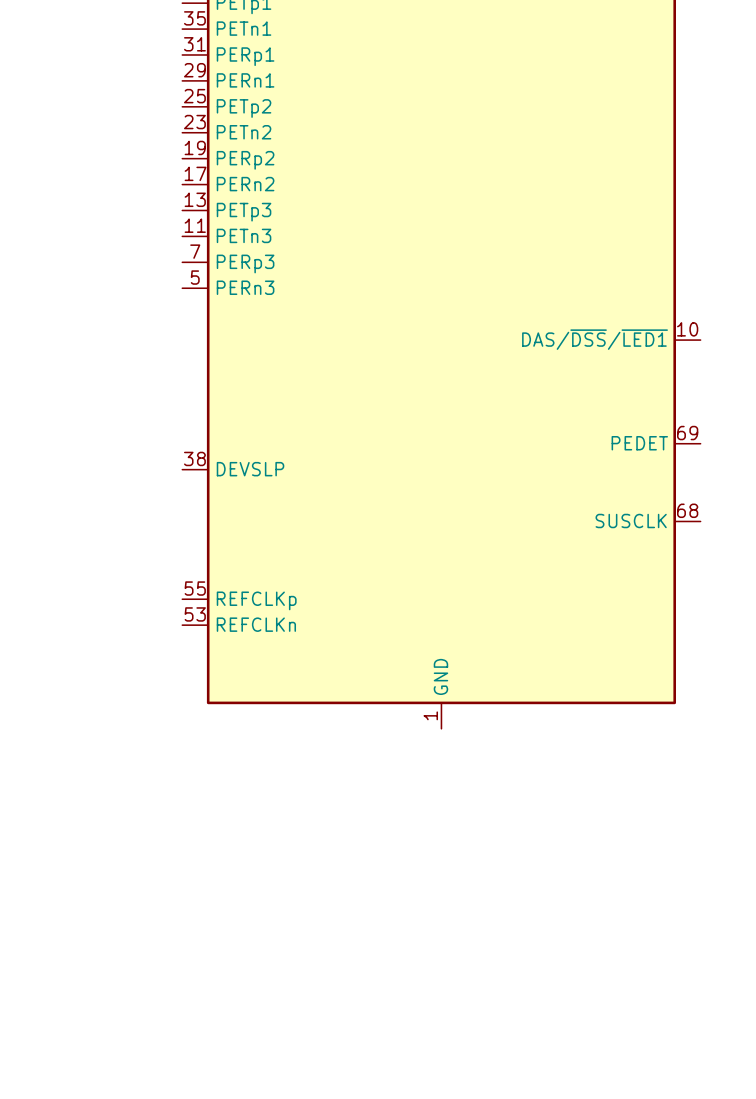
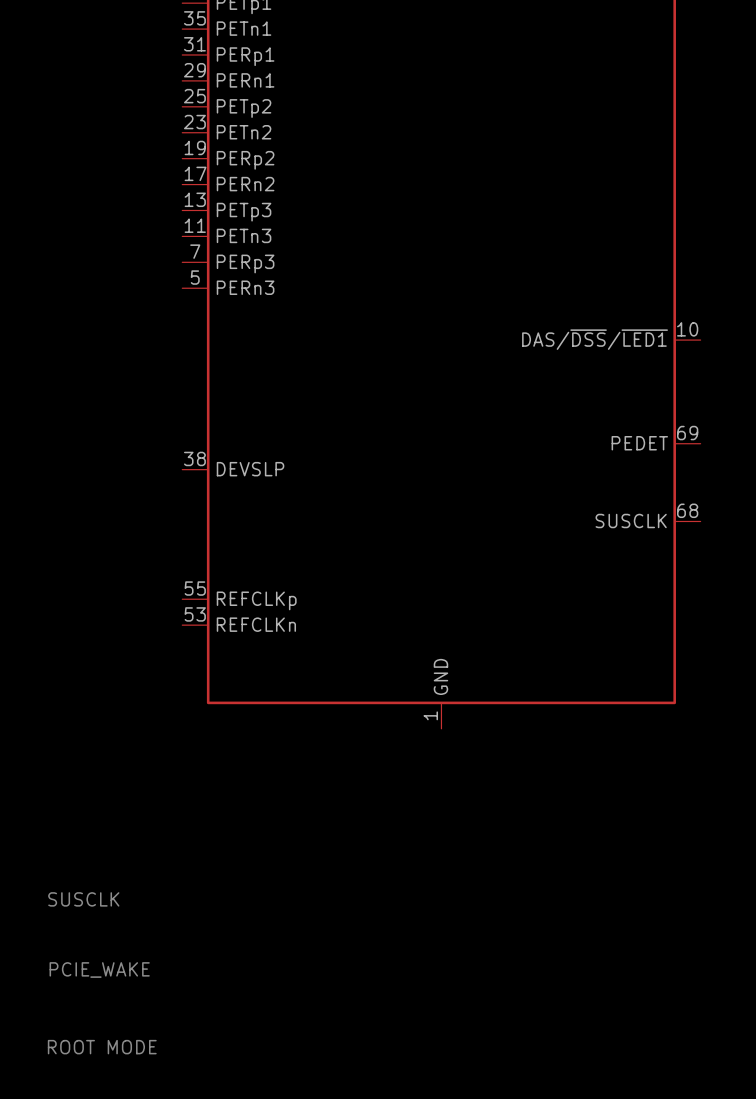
text: none -> SUSCLK (83, 899)
text: none -> PCIE_WAKE (99, 970)
text: none -> ROOT MODE (102, 1047)

